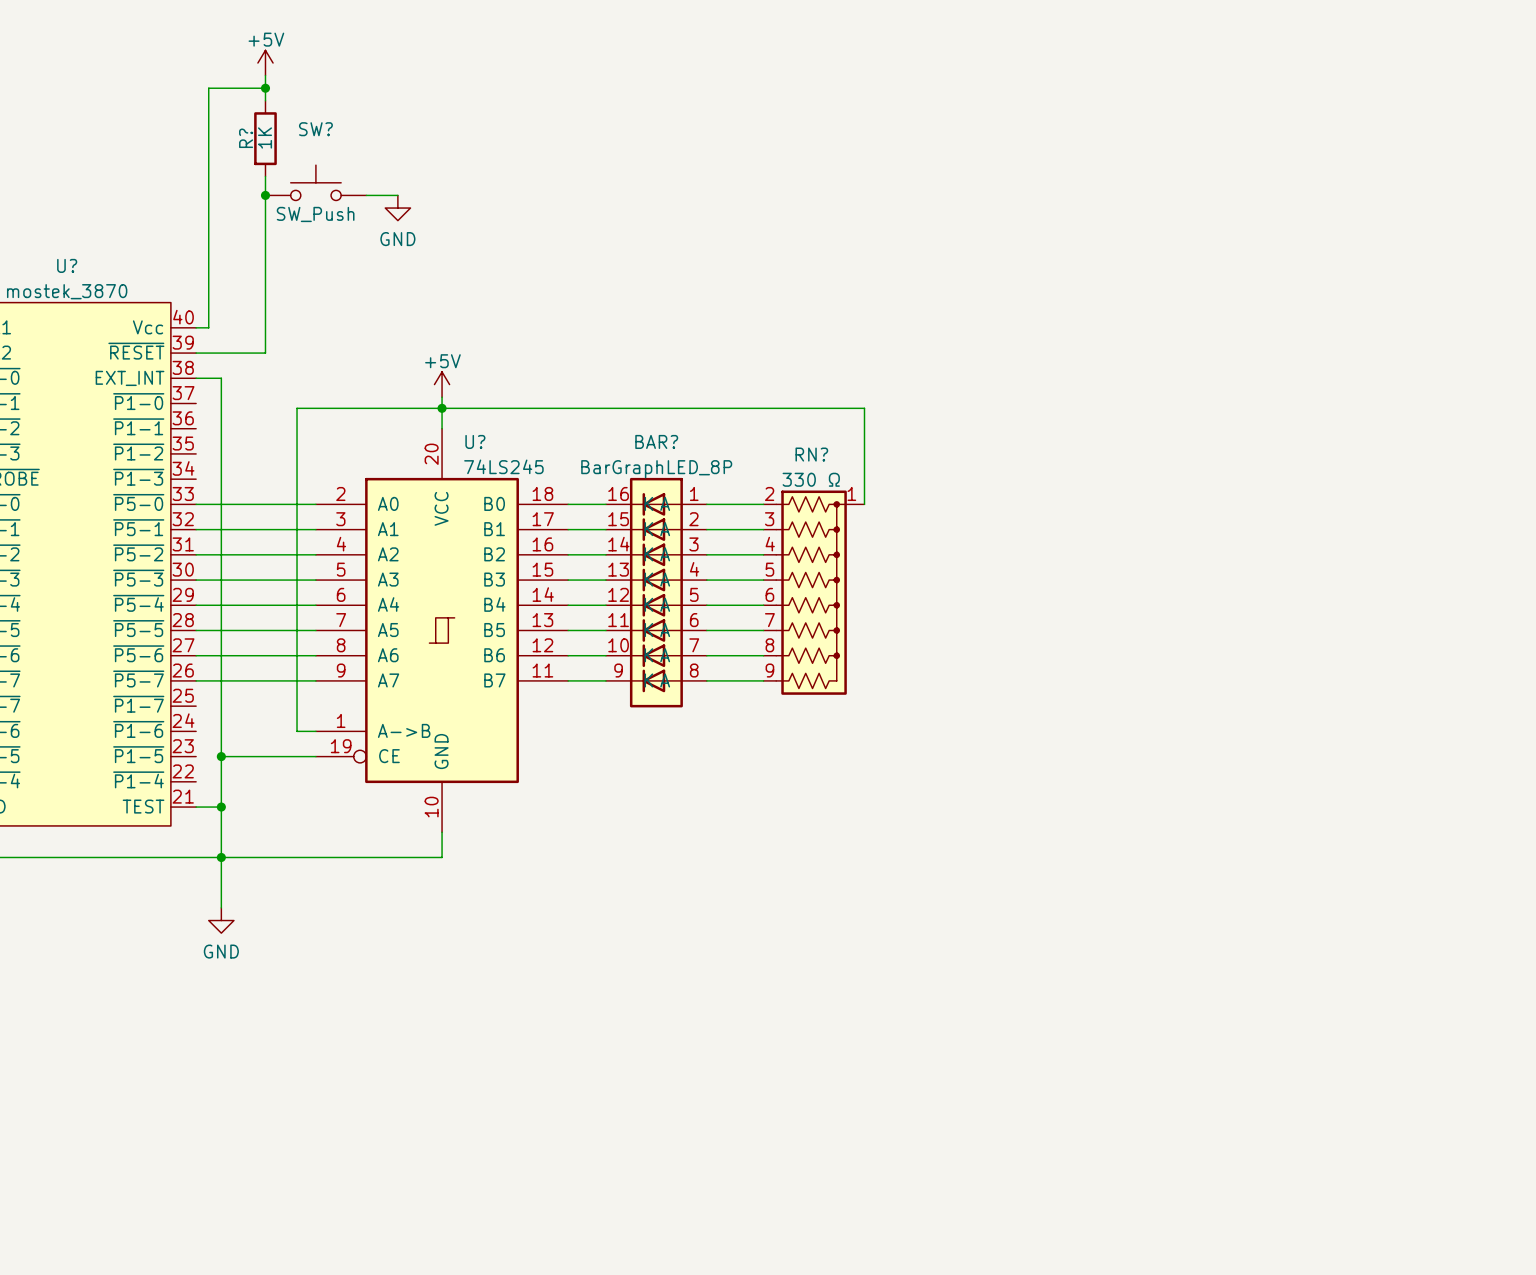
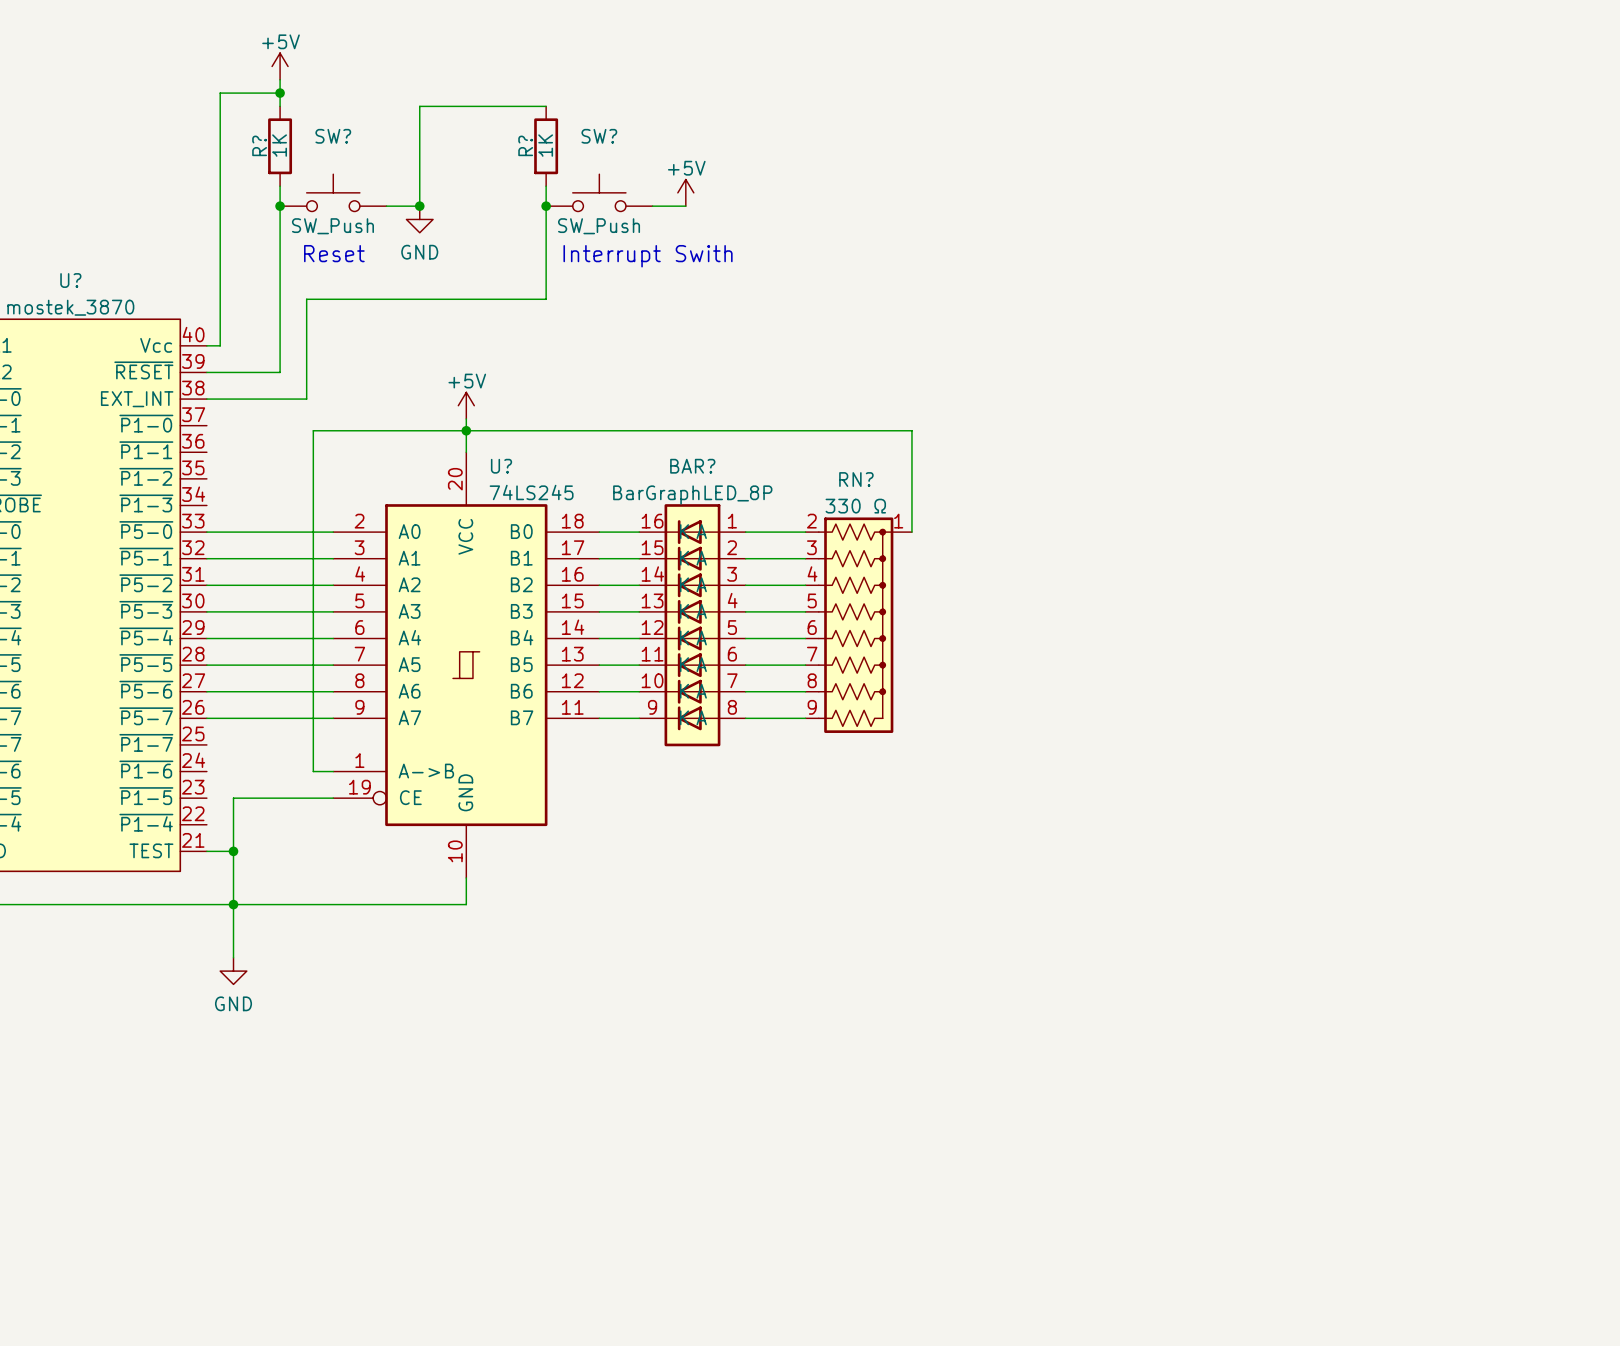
wire: none -> (546, 106) (419, 106) (419, 206)
R?: none -> 1K (546, 146)
SW?: none -> SW_Push (599, 192)
power symbol: none -> +5V (685, 192)
junction: none -> (419, 206)
junction: none -> (546, 206)
wire: none -> (652, 206) (685, 206)
text: none -> Reset (334, 253)
text: none -> Interrupt Swith (648, 256)
wire: (221, 378) (221, 756) -> (233, 399) (306, 399) (306, 299) (546, 299) (546, 186)
junction: (221, 756) -> none

